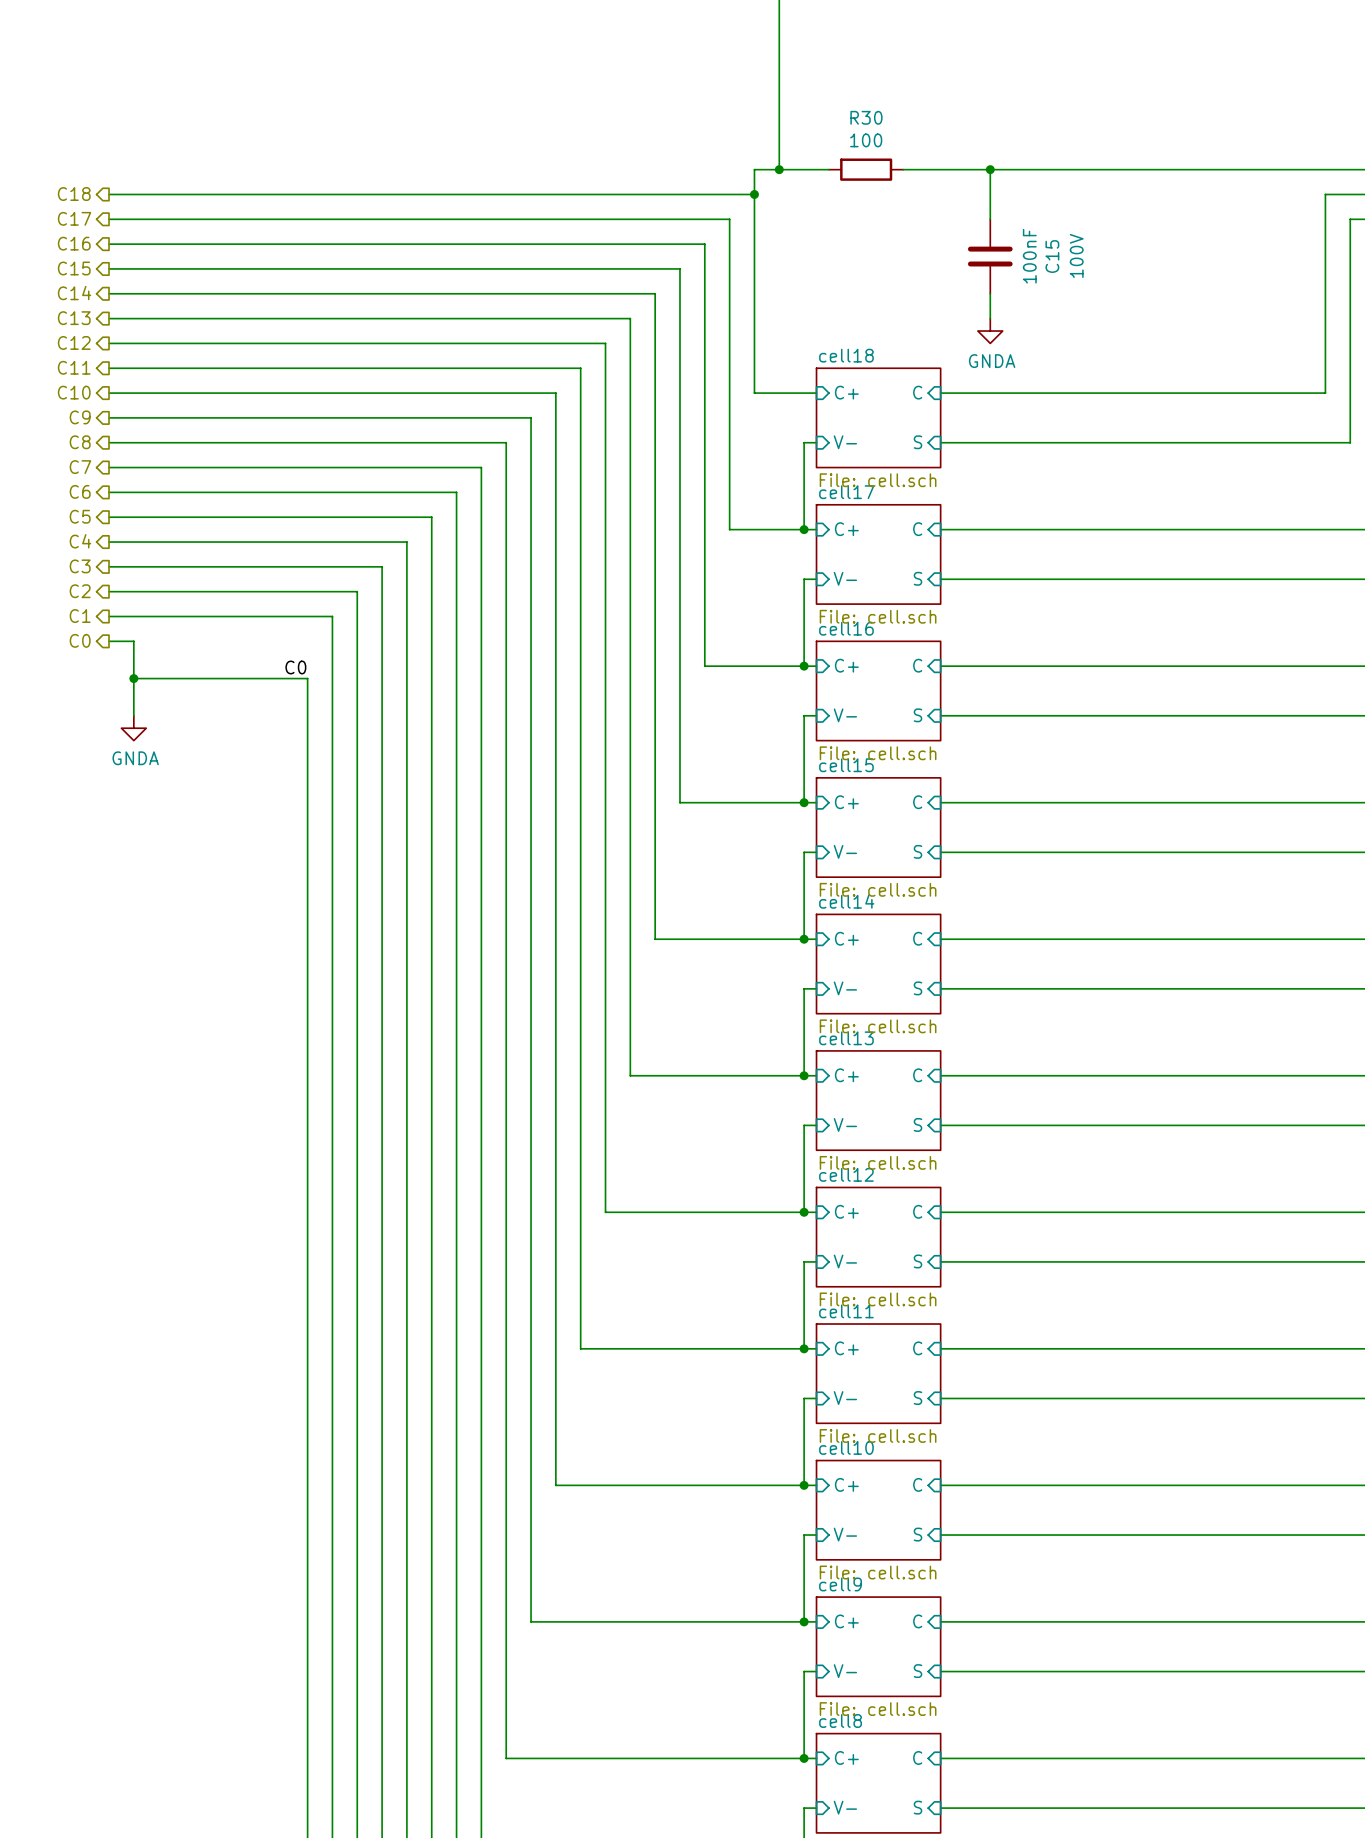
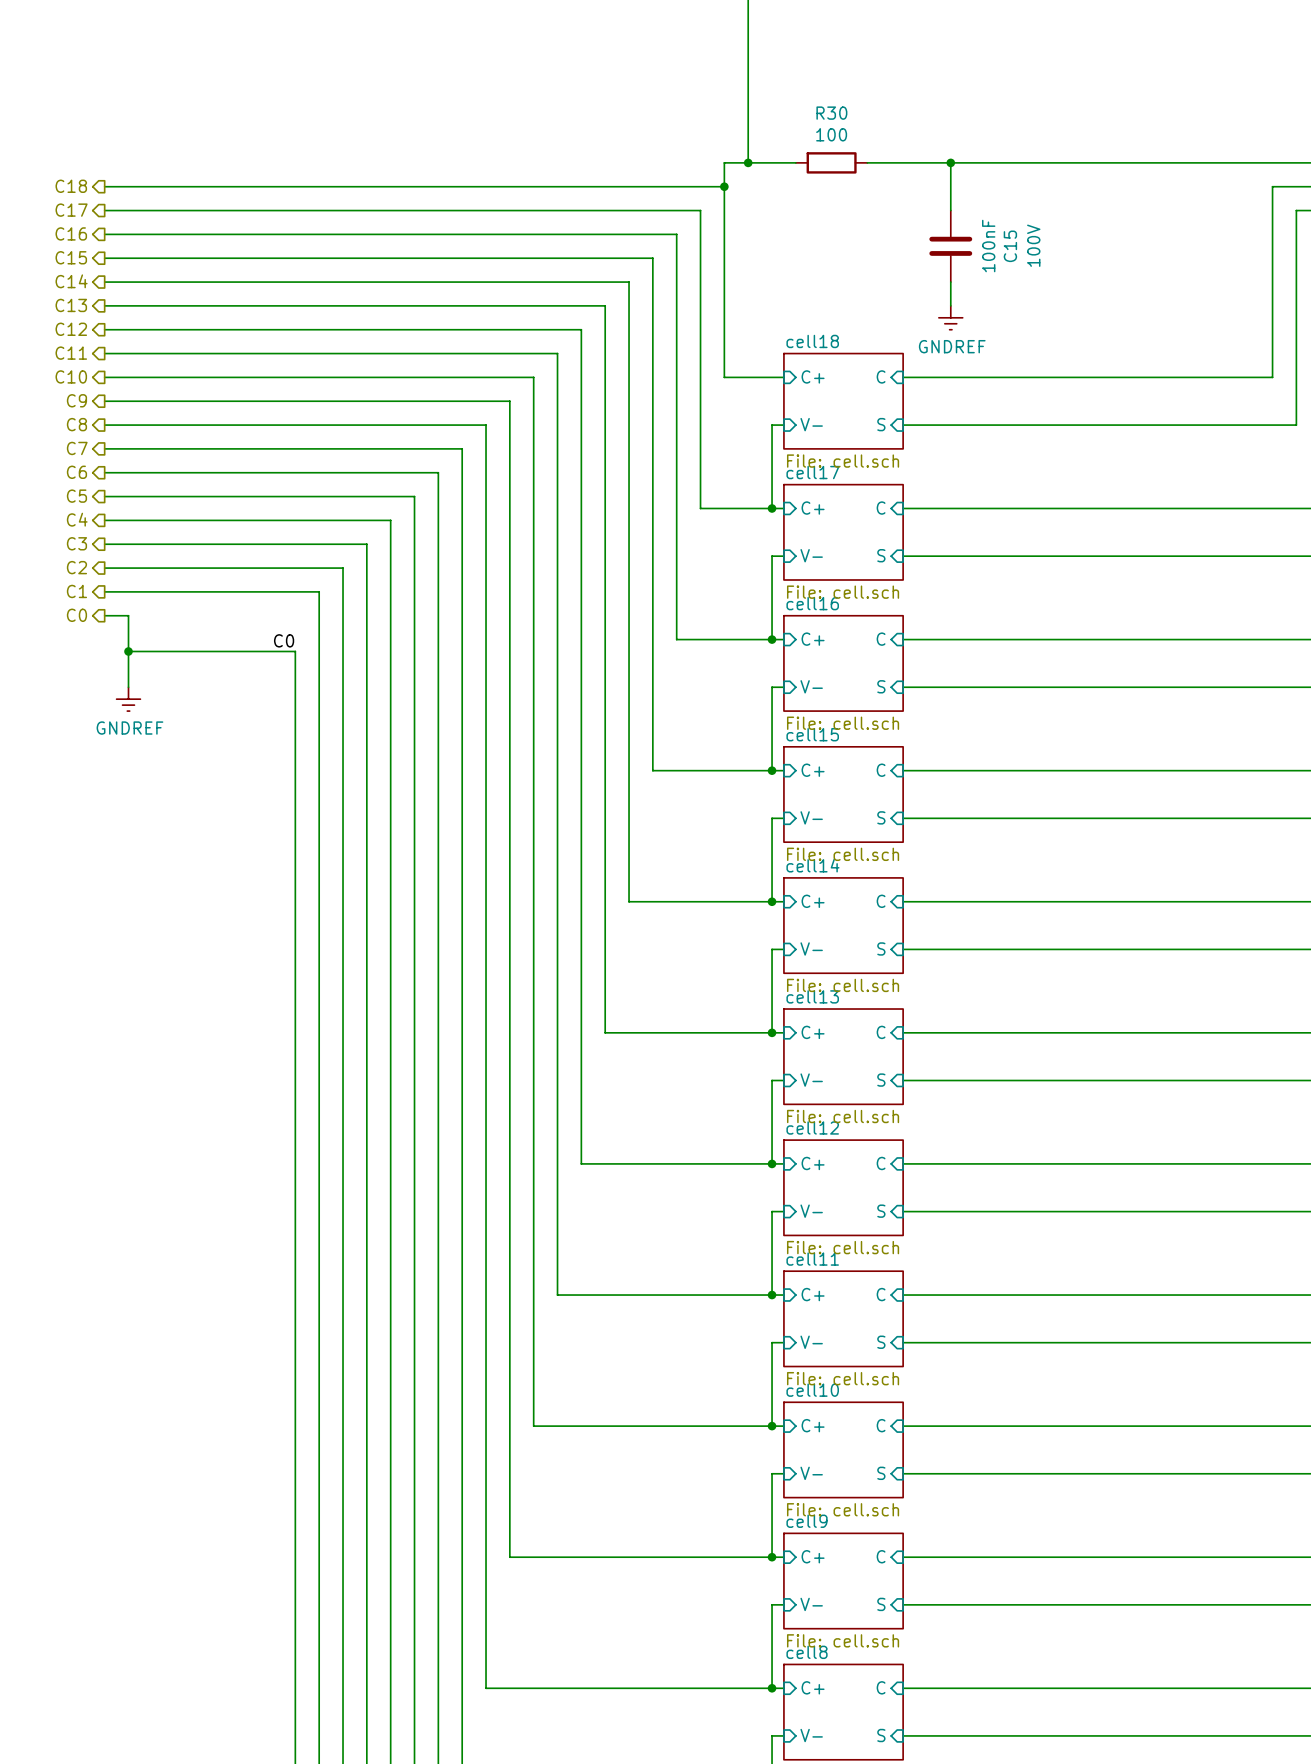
power symbol: GNDA (990, 331) -> GNDREF (950, 317)
power symbol: GNDA (133, 728) -> GNDREF (128, 699)

